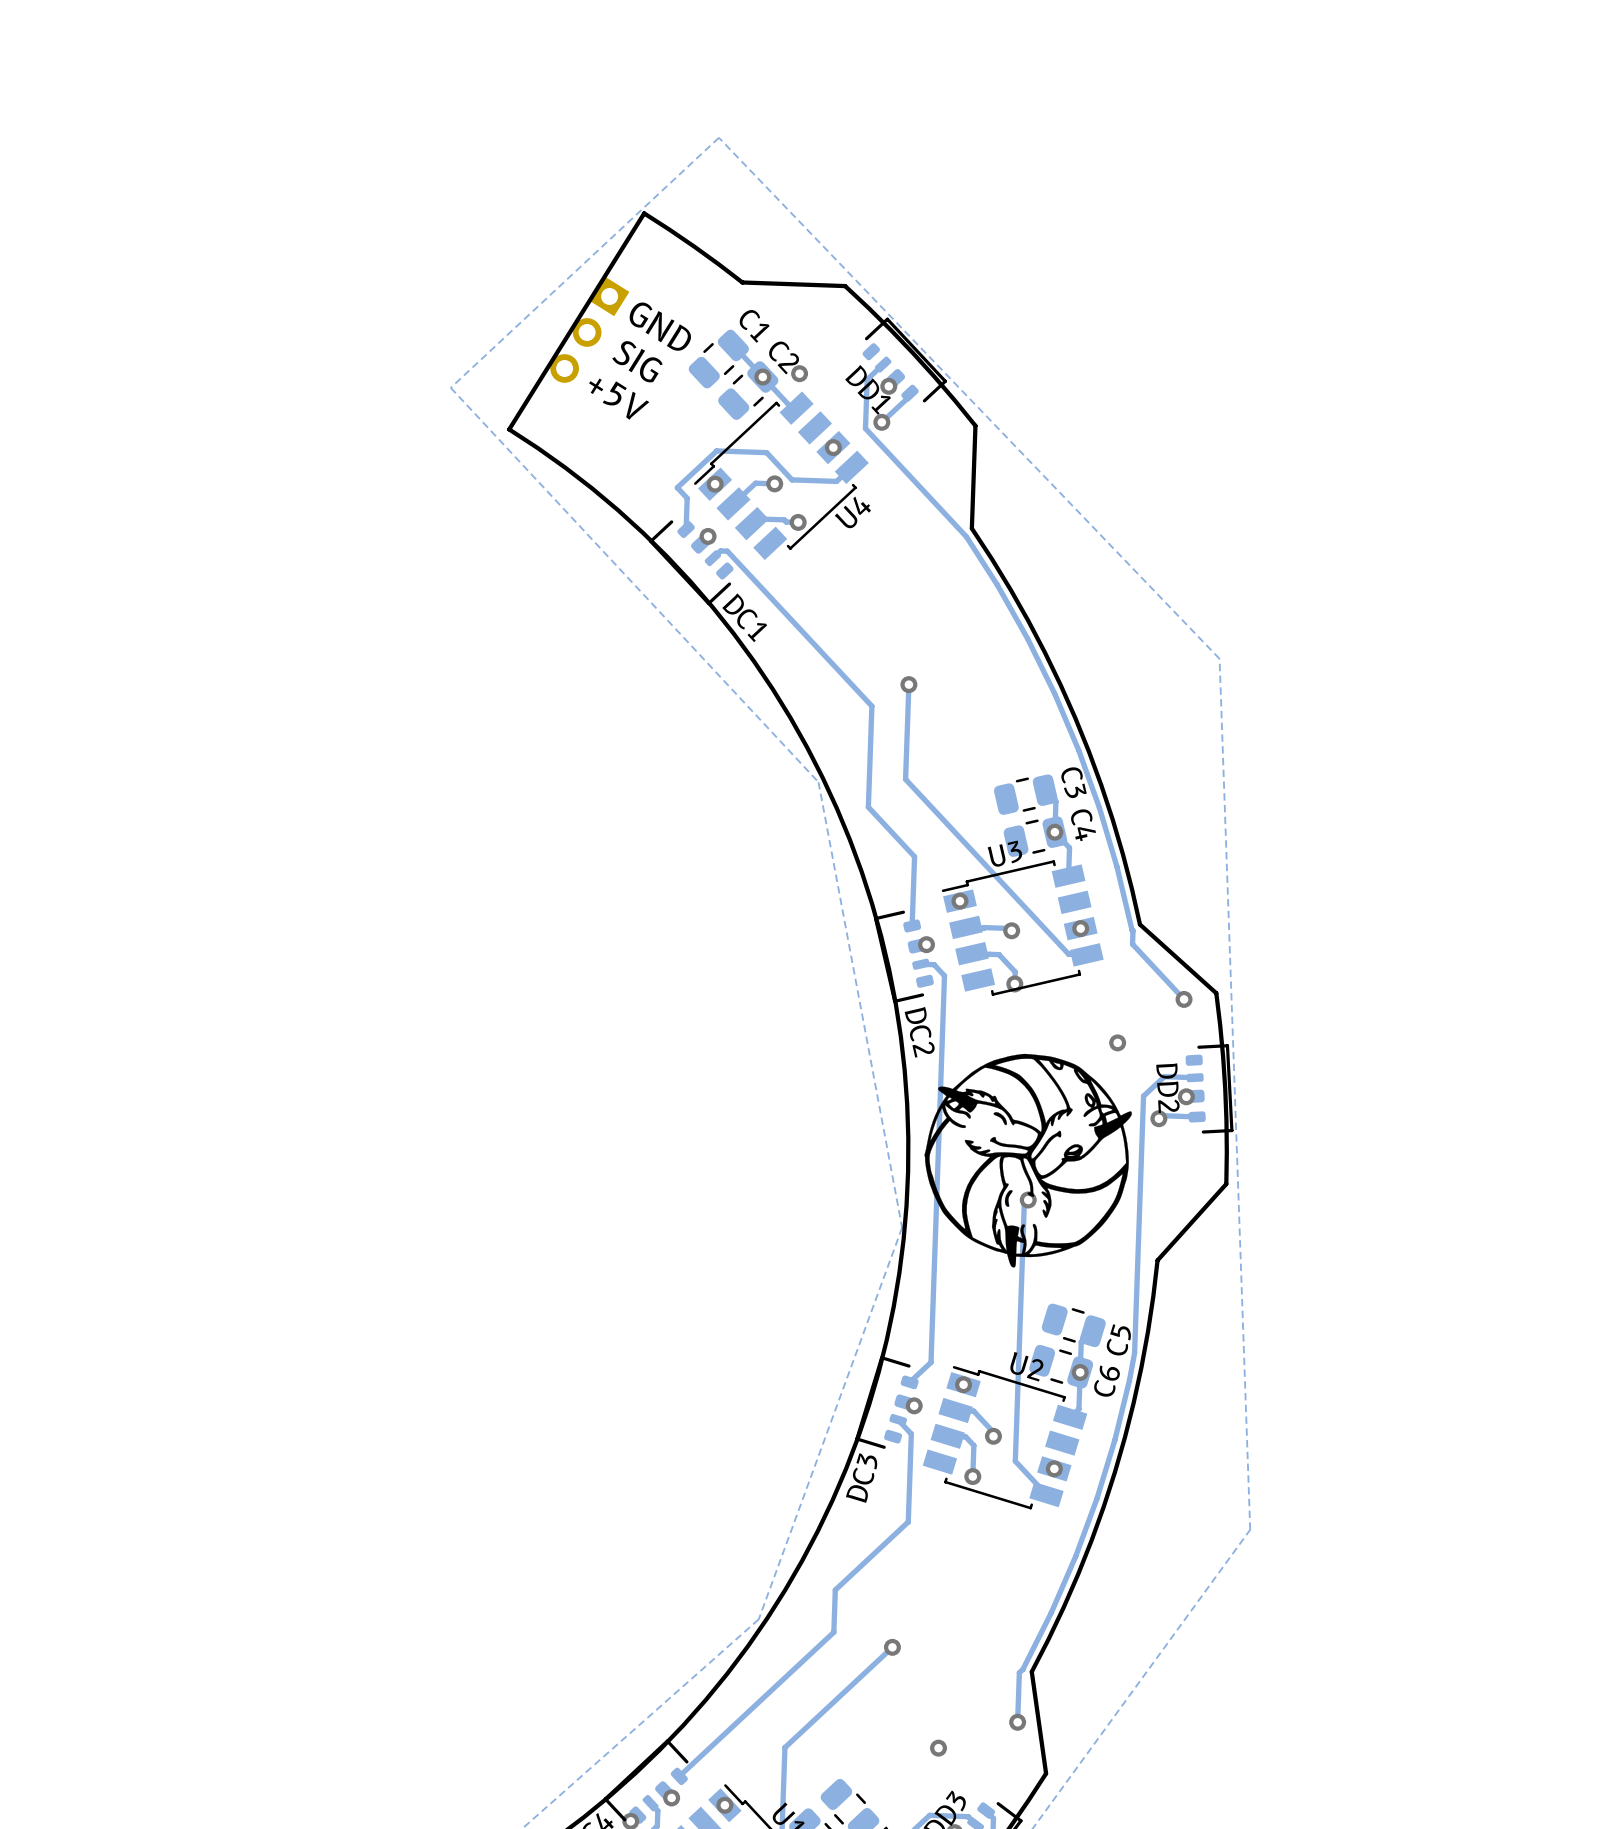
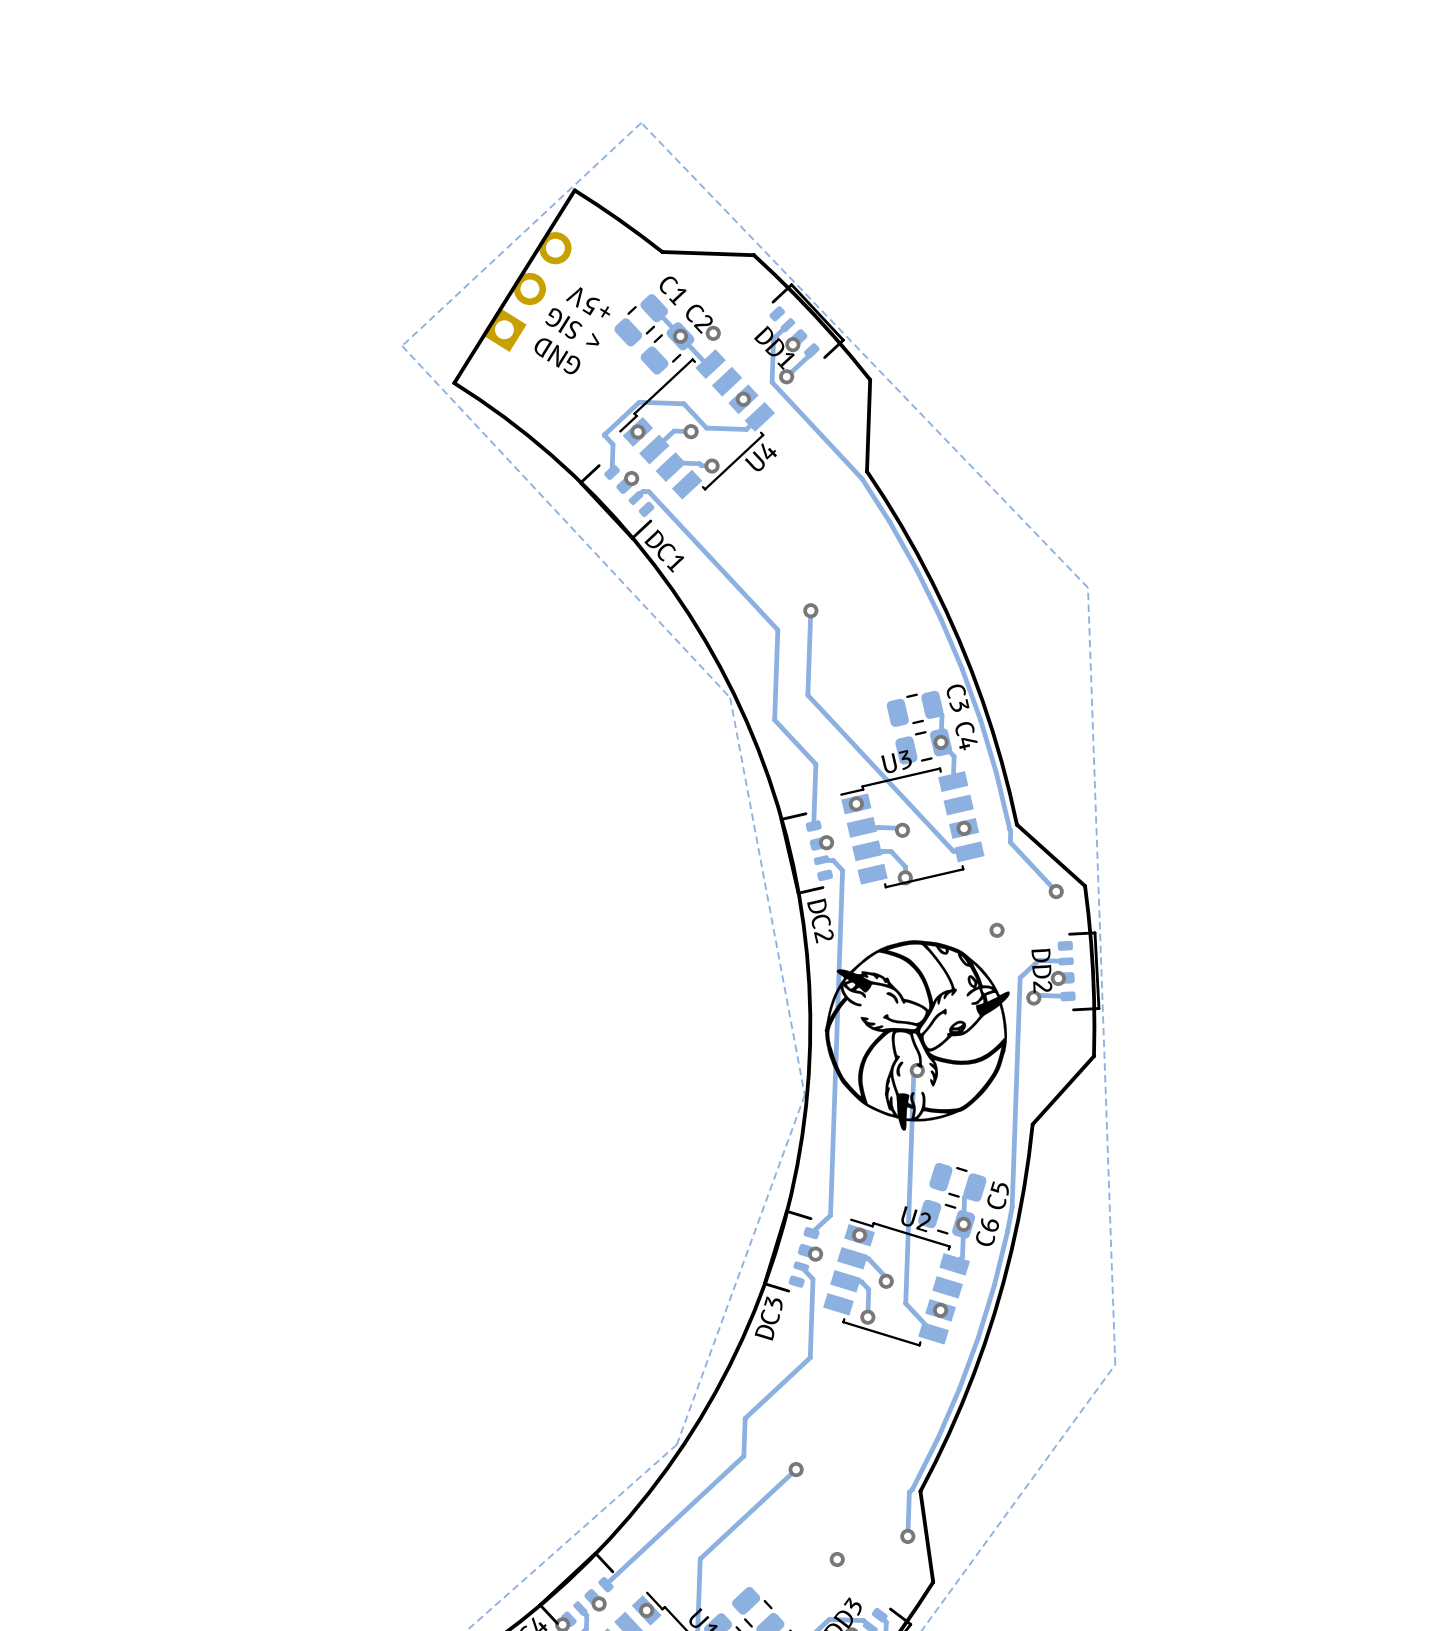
part footprint: [550, 276, 630, 383] -> [482, 232, 572, 352]
text: GND (660, 326) -> +5V (588, 302)
text: SIG (637, 361) -> < SIG (572, 326)
text: +5V (619, 399) -> GND (557, 356)

